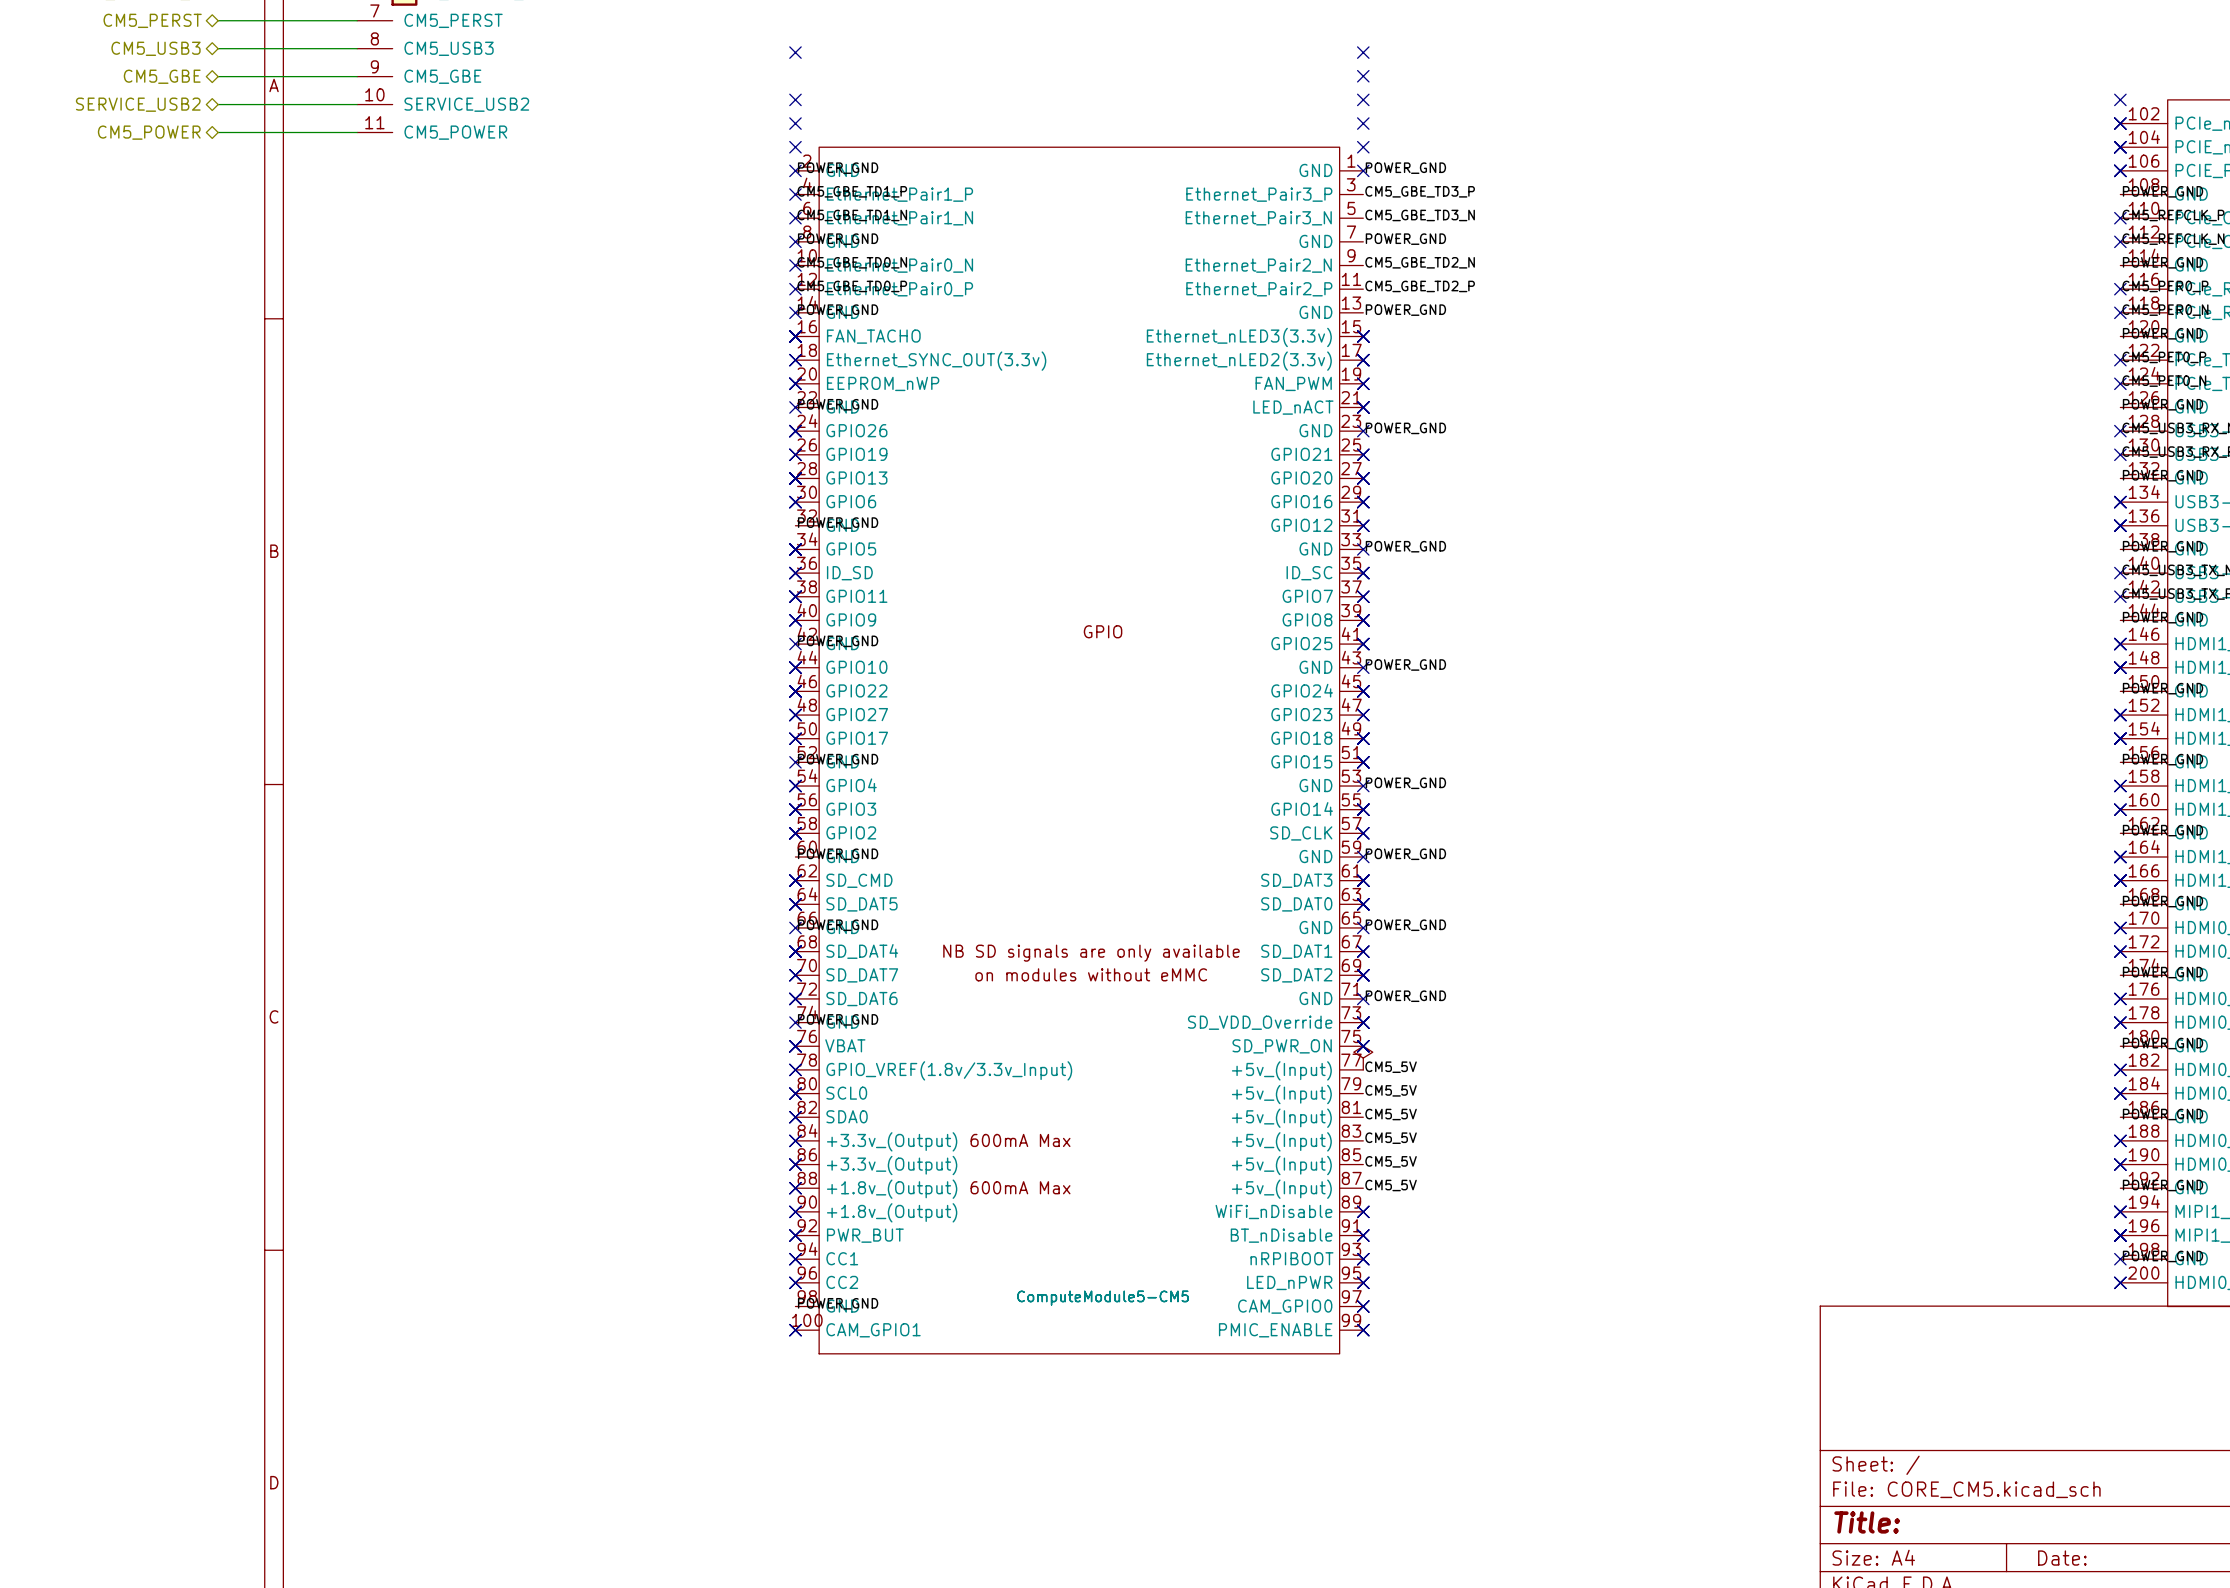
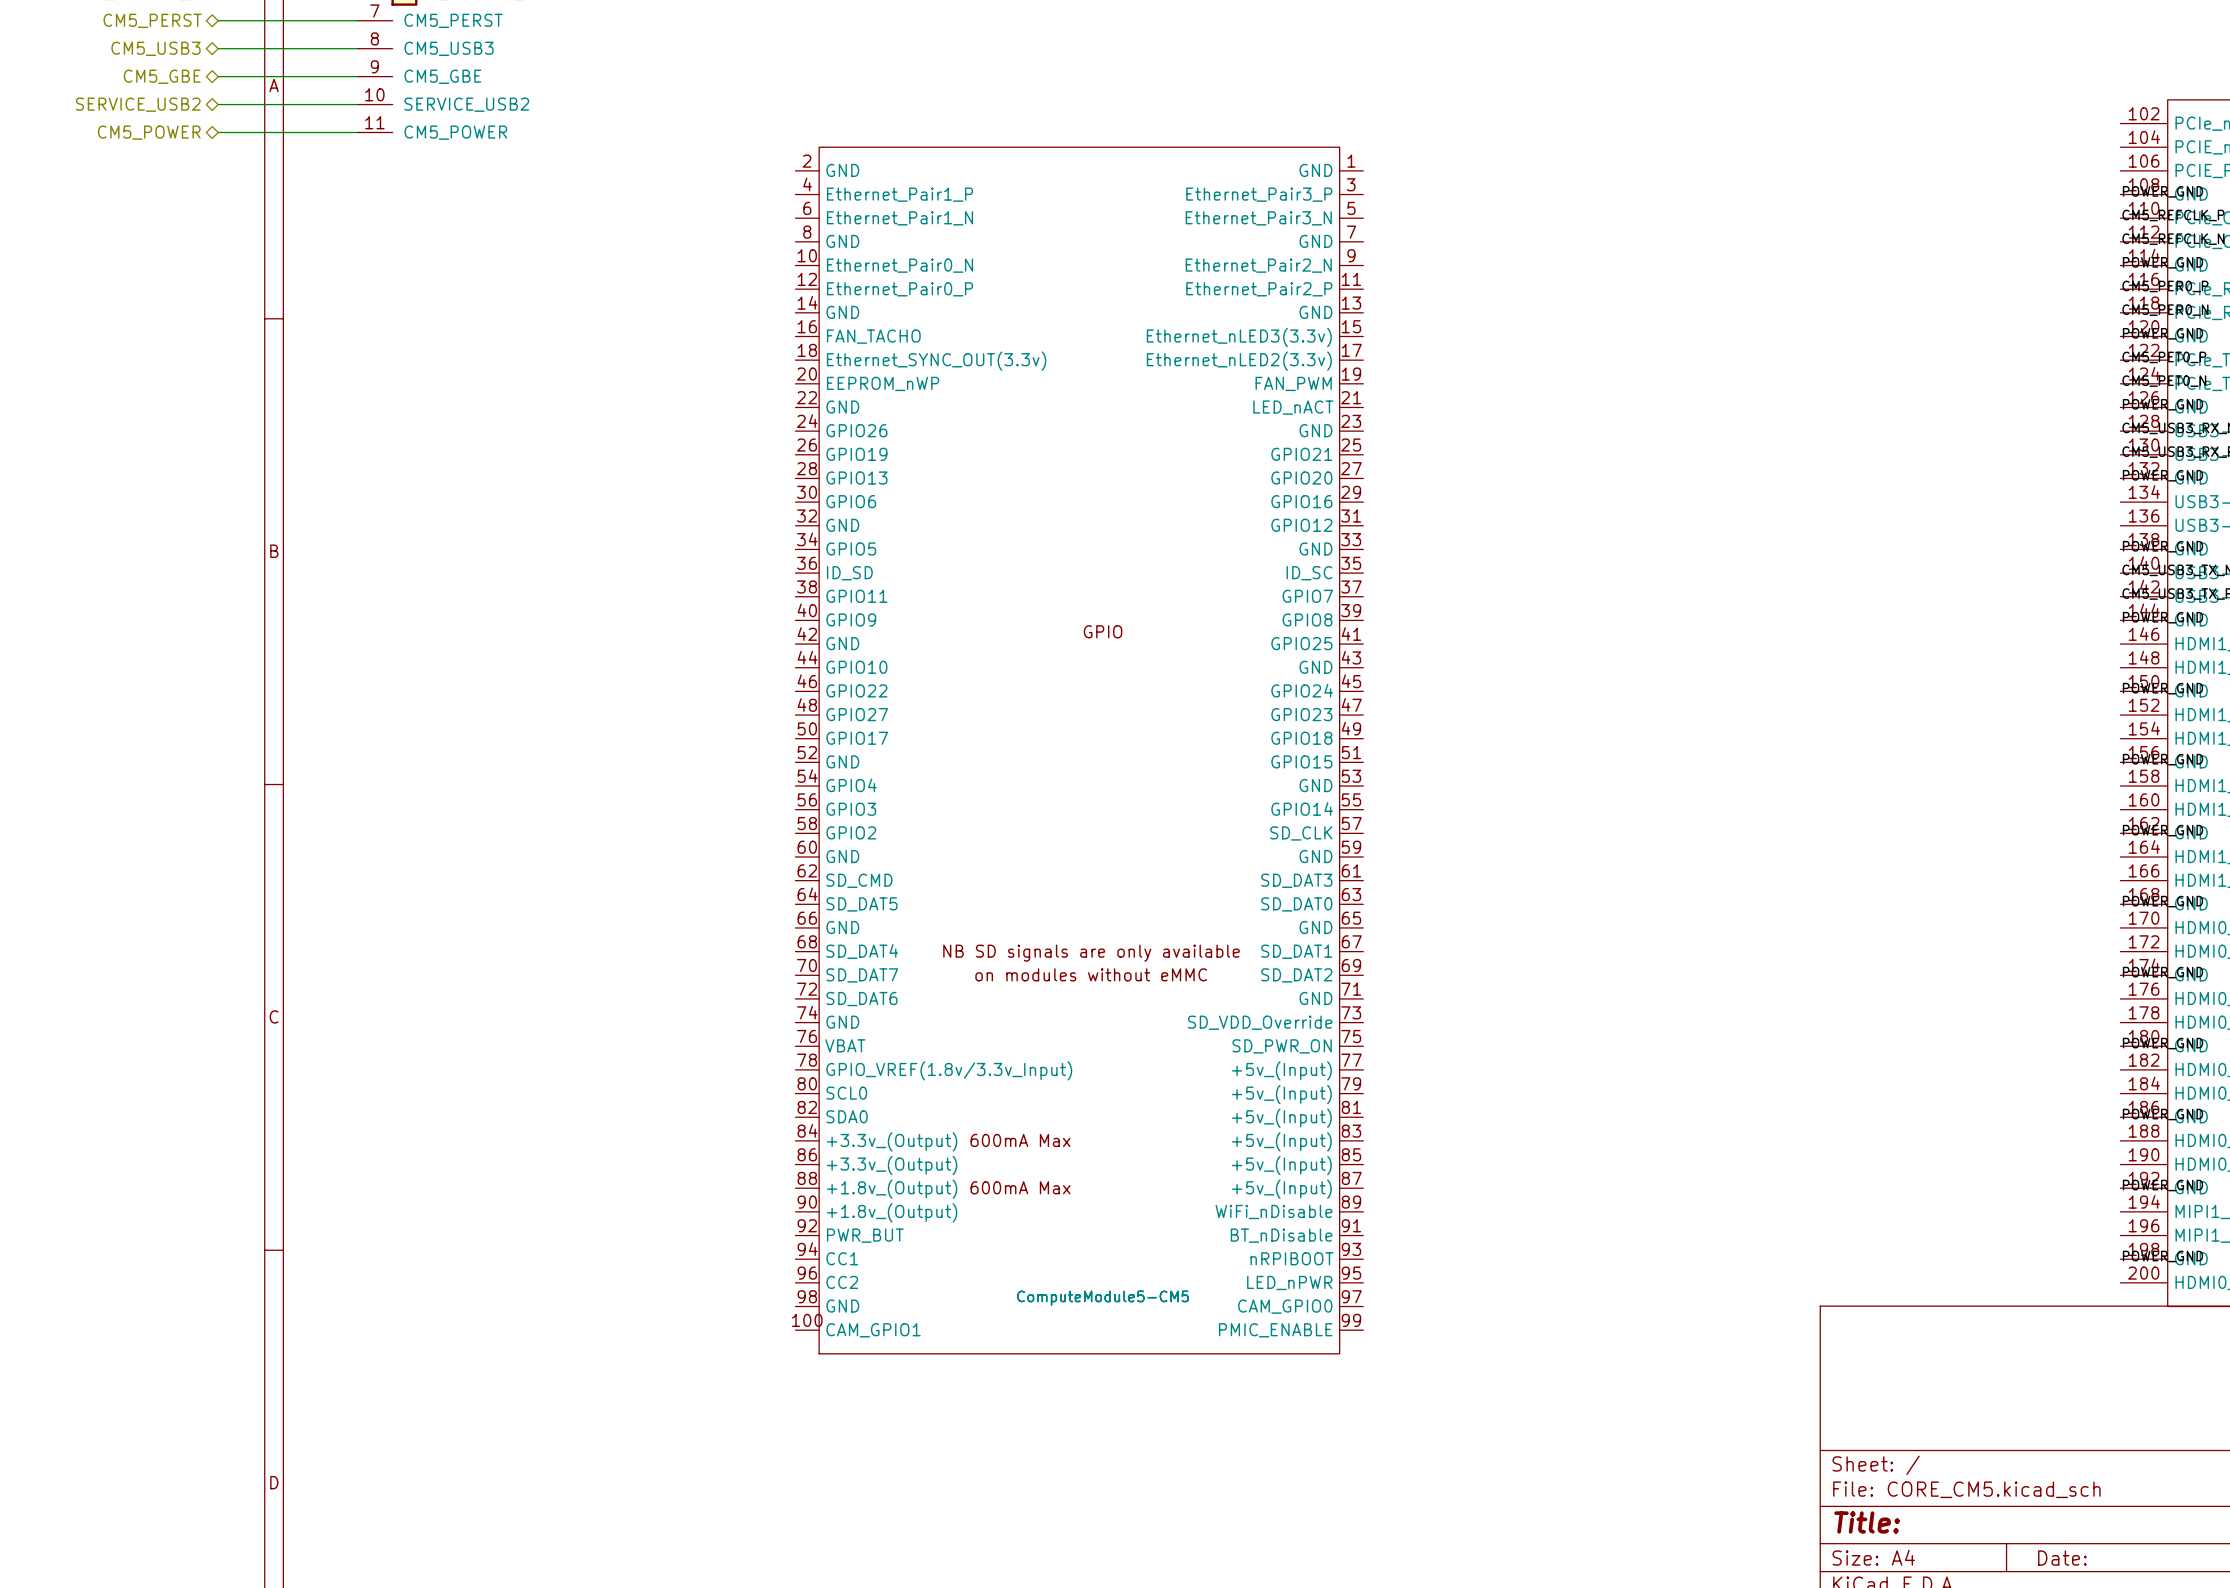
no-connect mark: (795, 52) -> none
no-connect mark: (1363, 52) -> none
no-connect mark: (1363, 76) -> none
no-connect mark: (795, 99) -> none
no-connect mark: (1363, 99) -> none
no-connect mark: (2120, 99) -> none
no-connect mark: (795, 123) -> none
no-connect mark: (1363, 123) -> none
no-connect mark: (2120, 123) -> none
no-connect mark: (795, 147) -> none
no-connect mark: (1363, 147) -> none
no-connect mark: (2120, 147) -> none
label: POWER_GND (838, 168) -> none
label: POWER_GND (1405, 168) -> none
no-connect mark: (795, 170) -> none
no-connect mark: (1363, 170) -> none
no-connect mark: (2120, 170) -> none
label: CM5_GBE_TD1_P (852, 191) -> none
label: CM5_GBE_TD3_P (1420, 191) -> none
no-connect mark: (795, 194) -> none
label: CM5_GBE_TD1_N (852, 215) -> none
label: CM5_GBE_TD3_N (1420, 215) -> none
no-connect mark: (795, 218) -> none
no-connect mark: (2120, 218) -> none
label: POWER_GND (838, 239) -> none
label: POWER_GND (1405, 239) -> none
no-connect mark: (795, 241) -> none
no-connect mark: (2120, 241) -> none
label: CM5_GBE_TD0_N (852, 262) -> none
label: CM5_GBE_TD2_N (1420, 262) -> none
no-connect mark: (795, 265) -> none
label: CM5_GBE_TD0_P (852, 286) -> none
label: CM5_GBE_TD2_P (1420, 286) -> none
no-connect mark: (795, 289) -> none
no-connect mark: (2120, 289) -> none
label: POWER_GND (838, 310) -> none
label: POWER_GND (1405, 310) -> none
no-connect mark: (795, 312) -> none
no-connect mark: (2120, 312) -> none
no-connect mark: (795, 336) -> none
no-connect mark: (1363, 336) -> none
no-connect mark: (795, 360) -> none
no-connect mark: (1363, 360) -> none
no-connect mark: (2120, 360) -> none
no-connect mark: (795, 383) -> none
no-connect mark: (1363, 383) -> none
no-connect mark: (2120, 383) -> none
label: POWER_GND (838, 404) -> none
no-connect mark: (795, 407) -> none
no-connect mark: (1363, 407) -> none
label: POWER_GND (1405, 428) -> none
no-connect mark: (795, 431) -> none
no-connect mark: (1363, 431) -> none
no-connect mark: (2120, 431) -> none
no-connect mark: (795, 454) -> none
no-connect mark: (1363, 454) -> none
no-connect mark: (2120, 454) -> none
no-connect mark: (795, 478) -> none
no-connect mark: (1363, 478) -> none
no-connect mark: (795, 502) -> none
no-connect mark: (1363, 502) -> none
no-connect mark: (2120, 502) -> none
label: POWER_GND (838, 523) -> none
no-connect mark: (1363, 525) -> none
no-connect mark: (2120, 525) -> none
label: POWER_GND (1405, 546) -> none
no-connect mark: (795, 549) -> none
no-connect mark: (1363, 549) -> none
no-connect mark: (795, 573) -> none
no-connect mark: (1363, 573) -> none
no-connect mark: (2120, 573) -> none
no-connect mark: (795, 596) -> none
no-connect mark: (1363, 596) -> none
no-connect mark: (2120, 596) -> none
no-connect mark: (795, 620) -> none
no-connect mark: (1363, 620) -> none
label: POWER_GND (838, 641) -> none
no-connect mark: (795, 644) -> none
no-connect mark: (1363, 644) -> none
no-connect mark: (2120, 644) -> none
label: POWER_GND (1405, 664) -> none
no-connect mark: (795, 667) -> none
no-connect mark: (1363, 667) -> none
no-connect mark: (2120, 667) -> none
no-connect mark: (795, 691) -> none
no-connect mark: (1363, 691) -> none
no-connect mark: (795, 715) -> none
no-connect mark: (1363, 715) -> none
no-connect mark: (2120, 715) -> none
no-connect mark: (795, 738) -> none
no-connect mark: (1363, 738) -> none
no-connect mark: (2120, 738) -> none
label: POWER_GND (838, 759) -> none
no-connect mark: (795, 762) -> none
no-connect mark: (1363, 762) -> none
label: POWER_GND (1405, 783) -> none
no-connect mark: (795, 786) -> none
no-connect mark: (1363, 786) -> none
no-connect mark: (2120, 786) -> none
no-connect mark: (795, 809) -> none
no-connect mark: (1363, 809) -> none
no-connect mark: (2120, 809) -> none
no-connect mark: (795, 833) -> none
no-connect mark: (1363, 833) -> none
label: POWER_GND (838, 854) -> none
label: POWER_GND (1405, 854) -> none
no-connect mark: (1363, 856) -> none
no-connect mark: (2120, 856) -> none
no-connect mark: (795, 880) -> none
no-connect mark: (1363, 880) -> none
no-connect mark: (2120, 880) -> none
no-connect mark: (795, 904) -> none
no-connect mark: (1363, 904) -> none
label: POWER_GND (838, 925) -> none
label: POWER_GND (1405, 925) -> none
no-connect mark: (795, 927) -> none
no-connect mark: (1363, 927) -> none
no-connect mark: (2120, 927) -> none
no-connect mark: (795, 951) -> none
no-connect mark: (1363, 951) -> none
no-connect mark: (2120, 951) -> none
no-connect mark: (795, 975) -> none
no-connect mark: (1363, 975) -> none
label: POWER_GND (1405, 996) -> none
no-connect mark: (795, 998) -> none
no-connect mark: (1363, 998) -> none
no-connect mark: (2120, 998) -> none
label: POWER_GND (838, 1019) -> none
no-connect mark: (795, 1022) -> none
no-connect mark: (1363, 1022) -> none
no-connect mark: (2120, 1022) -> none
no-connect mark: (795, 1046) -> none
no-connect mark: (1363, 1046) -> none
power symbol: (1363, 1058) -> none
label: CM5_5V (1391, 1067) -> none
no-connect mark: (795, 1069) -> none
no-connect mark: (2120, 1069) -> none
label: CM5_5V (1391, 1090) -> none
no-connect mark: (795, 1093) -> none
no-connect mark: (2120, 1093) -> none
label: CM5_5V (1391, 1114) -> none
no-connect mark: (795, 1117) -> none
label: CM5_5V (1391, 1138) -> none
no-connect mark: (795, 1140) -> none
no-connect mark: (2120, 1140) -> none
label: CM5_5V (1391, 1161) -> none
no-connect mark: (795, 1164) -> none
no-connect mark: (2120, 1164) -> none
label: CM5_5V (1391, 1185) -> none
no-connect mark: (795, 1188) -> none
no-connect mark: (795, 1211) -> none
no-connect mark: (1363, 1211) -> none
no-connect mark: (2120, 1211) -> none
no-connect mark: (795, 1235) -> none
no-connect mark: (1363, 1235) -> none
no-connect mark: (2120, 1235) -> none
no-connect mark: (795, 1259) -> none
no-connect mark: (1363, 1259) -> none
no-connect mark: (2120, 1259) -> none
no-connect mark: (795, 1282) -> none
no-connect mark: (1363, 1282) -> none
no-connect mark: (2120, 1282) -> none
label: POWER_GND (838, 1303) -> none
no-connect mark: (1363, 1306) -> none
no-connect mark: (795, 1330) -> none
no-connect mark: (1363, 1330) -> none

